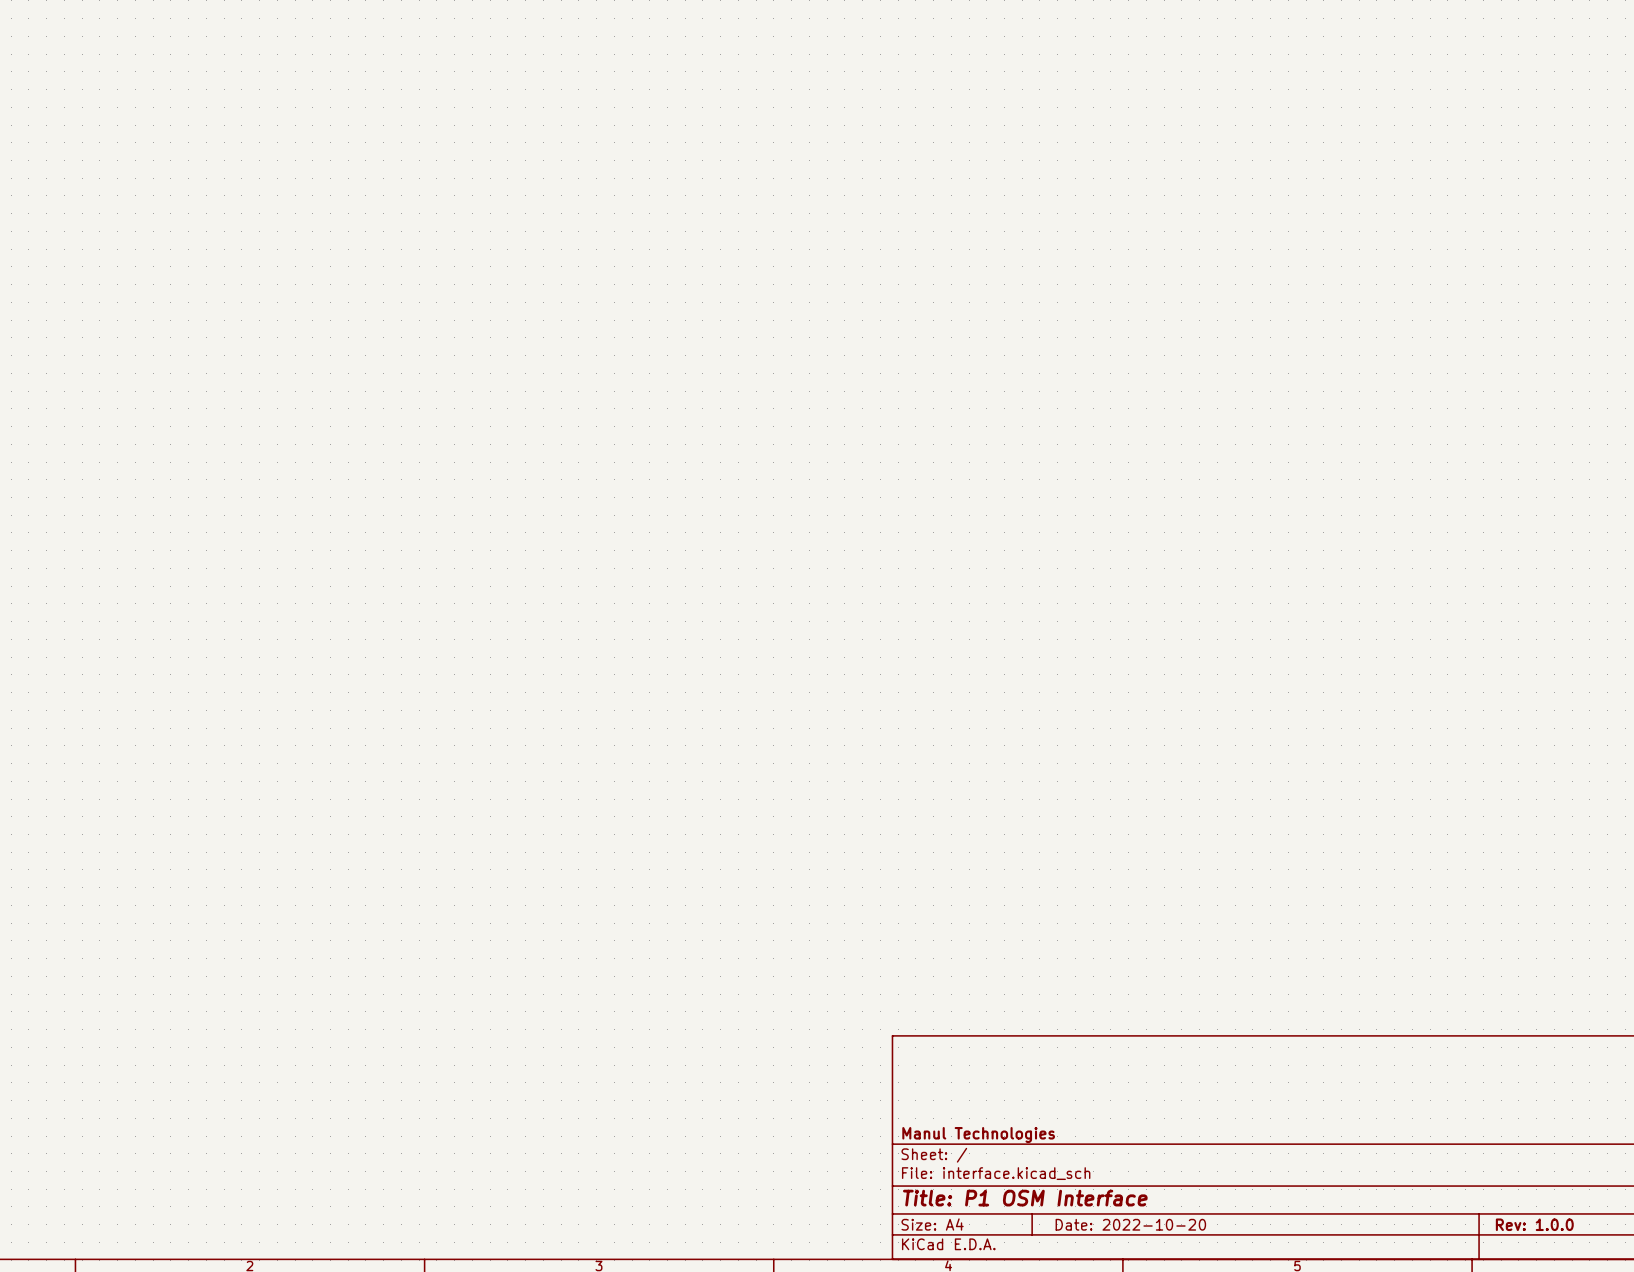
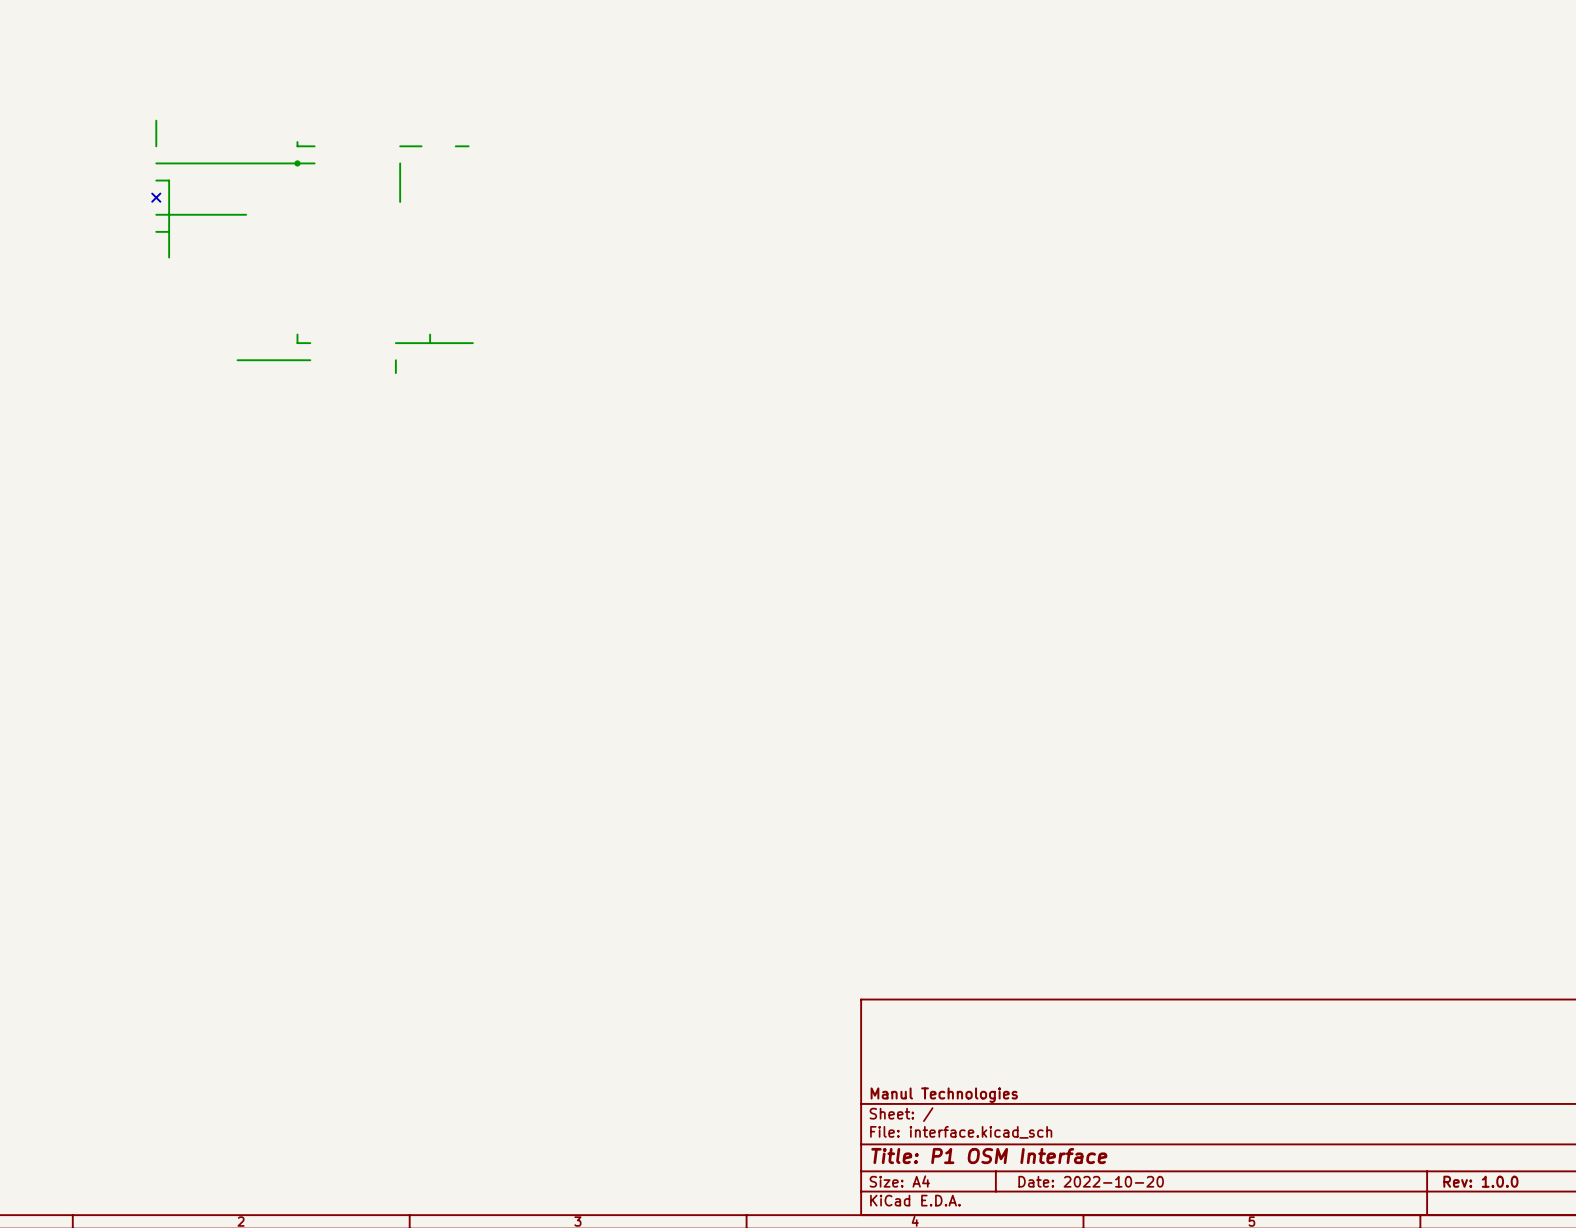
wire: none -> (156, 120) (156, 146)
wire: none -> (297, 142) (297, 146) (314, 146)
wire: none -> (400, 146) (421, 146)
wire: none -> (455, 146) (468, 146)
wire: none -> (156, 163) (314, 163)
junction: none -> (297, 163)
wire: none -> (400, 163) (400, 201)
wire: none -> (156, 180) (169, 180) (169, 257)
no-connect mark: none -> (156, 197)
wire: none -> (156, 214) (246, 214)
wire: none -> (156, 231) (169, 231)
wire: none -> (297, 334) (297, 343) (310, 343)
wire: none -> (430, 334) (430, 343)
wire: none -> (395, 343) (472, 343)
wire: none -> (237, 360) (310, 360)
wire: none -> (395, 360) (395, 373)

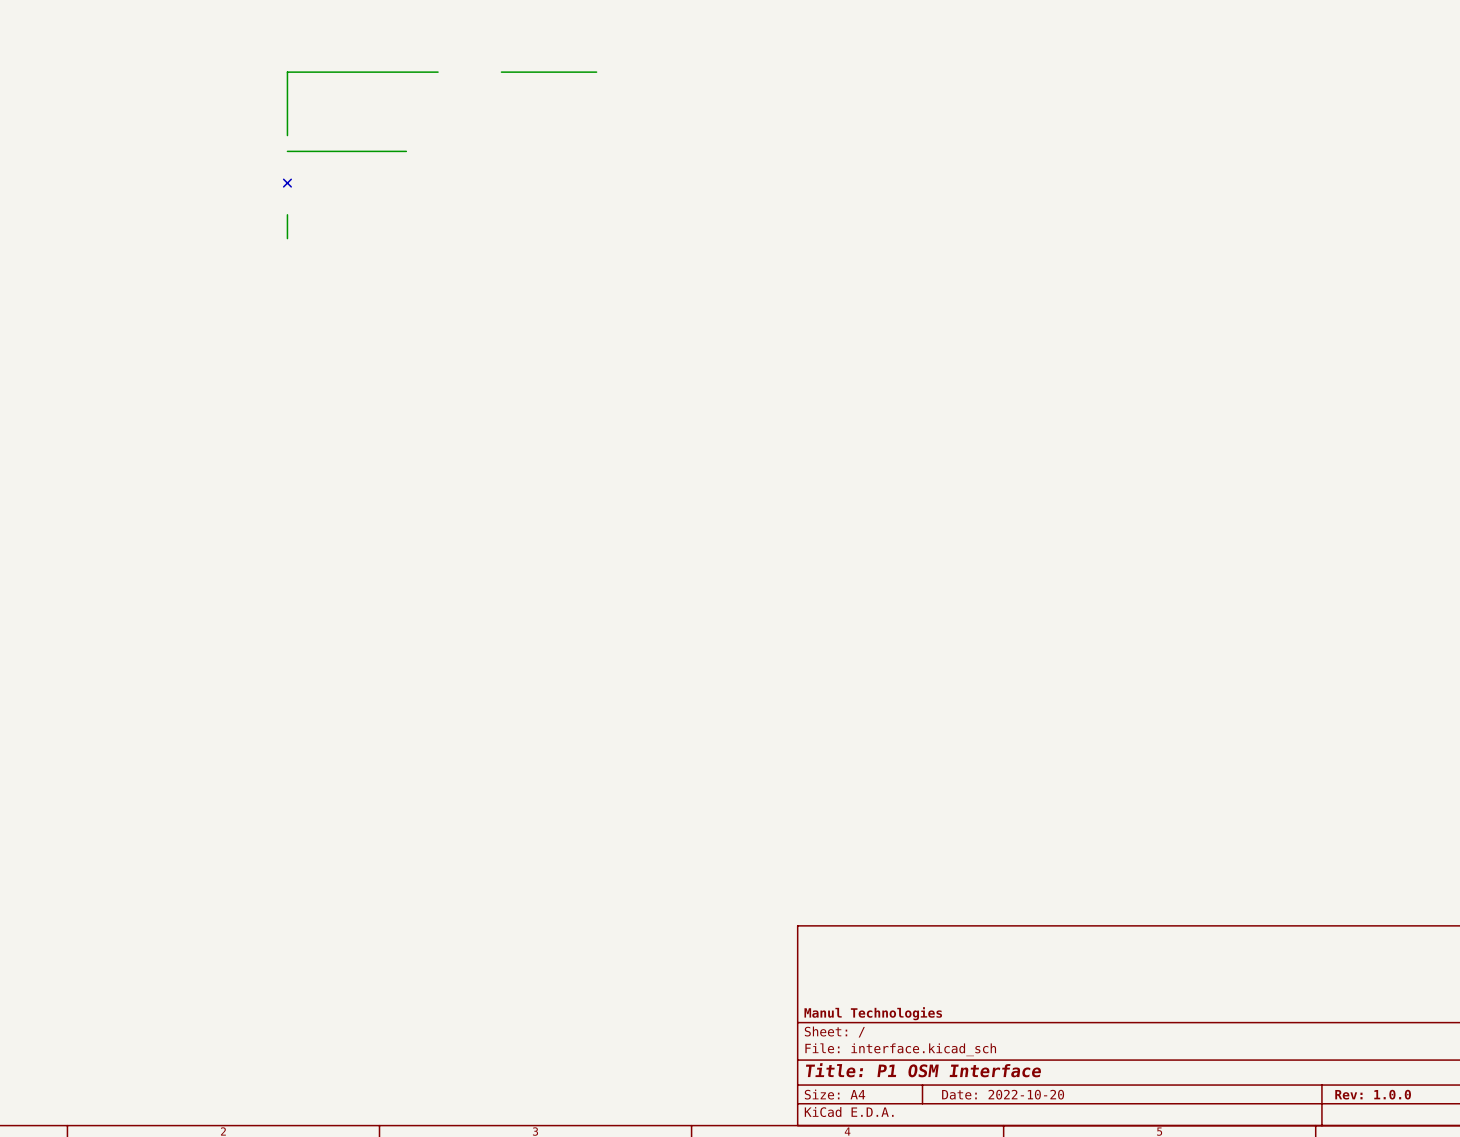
wire: none -> (438, 72) (287, 72) (287, 135)
wire: none -> (501, 72) (596, 72)
wire: (156, 120) (156, 146) -> none
wire: (297, 142) (297, 146) (314, 146) -> none
wire: (400, 146) (421, 146) -> none
wire: (455, 146) (468, 146) -> none
wire: (156, 163) (310, 163) -> none
junction: (297, 163) -> none
wire: none -> (291, 151) (406, 151)
wire: (400, 163) (400, 201) -> none
wire: (156, 180) (169, 180) (169, 257) -> none
no-connect mark: (156, 197) -> none
no-connect mark: none -> (287, 183)
wire: (156, 214) (246, 214) -> none
wire: (156, 231) (169, 231) -> none
wire: none -> (287, 214) (287, 238)
wire: (297, 334) (297, 343) (310, 343) -> none
wire: (430, 334) (430, 343) -> none
wire: (395, 343) (472, 343) -> none
wire: (237, 360) (310, 360) -> none
wire: (395, 360) (395, 373) -> none

